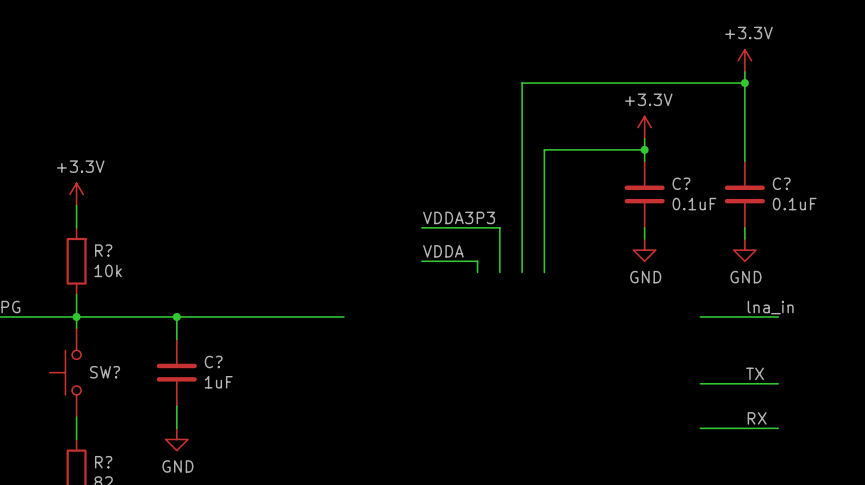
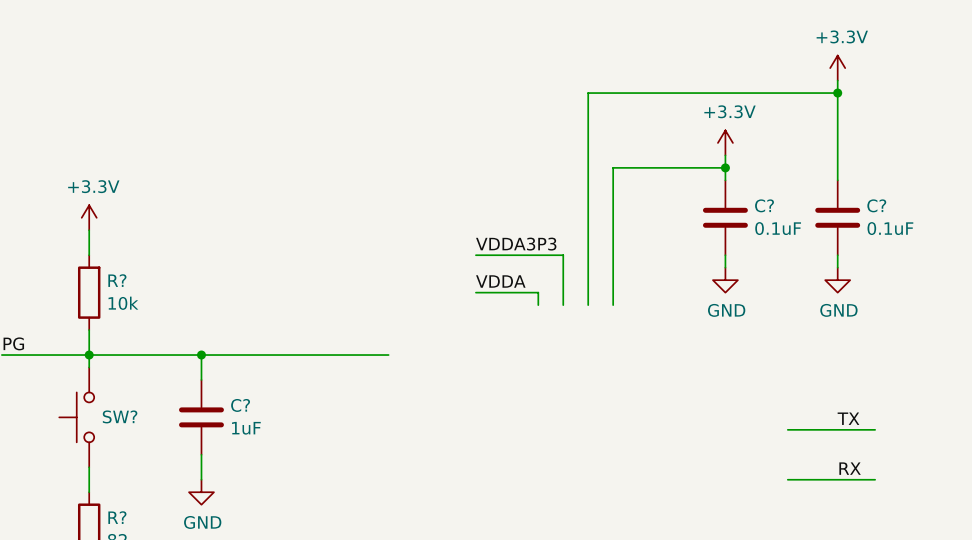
label: lna_in (770, 307) -> none
wire: (700, 316) (778, 316) -> none

